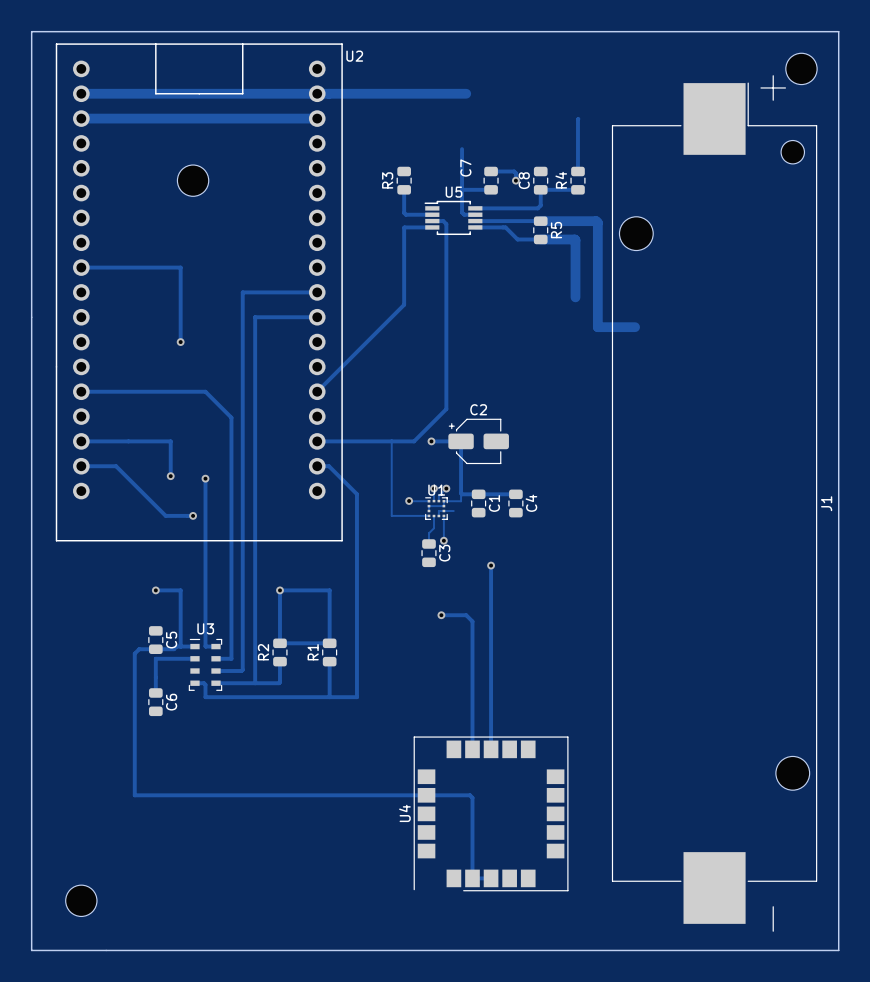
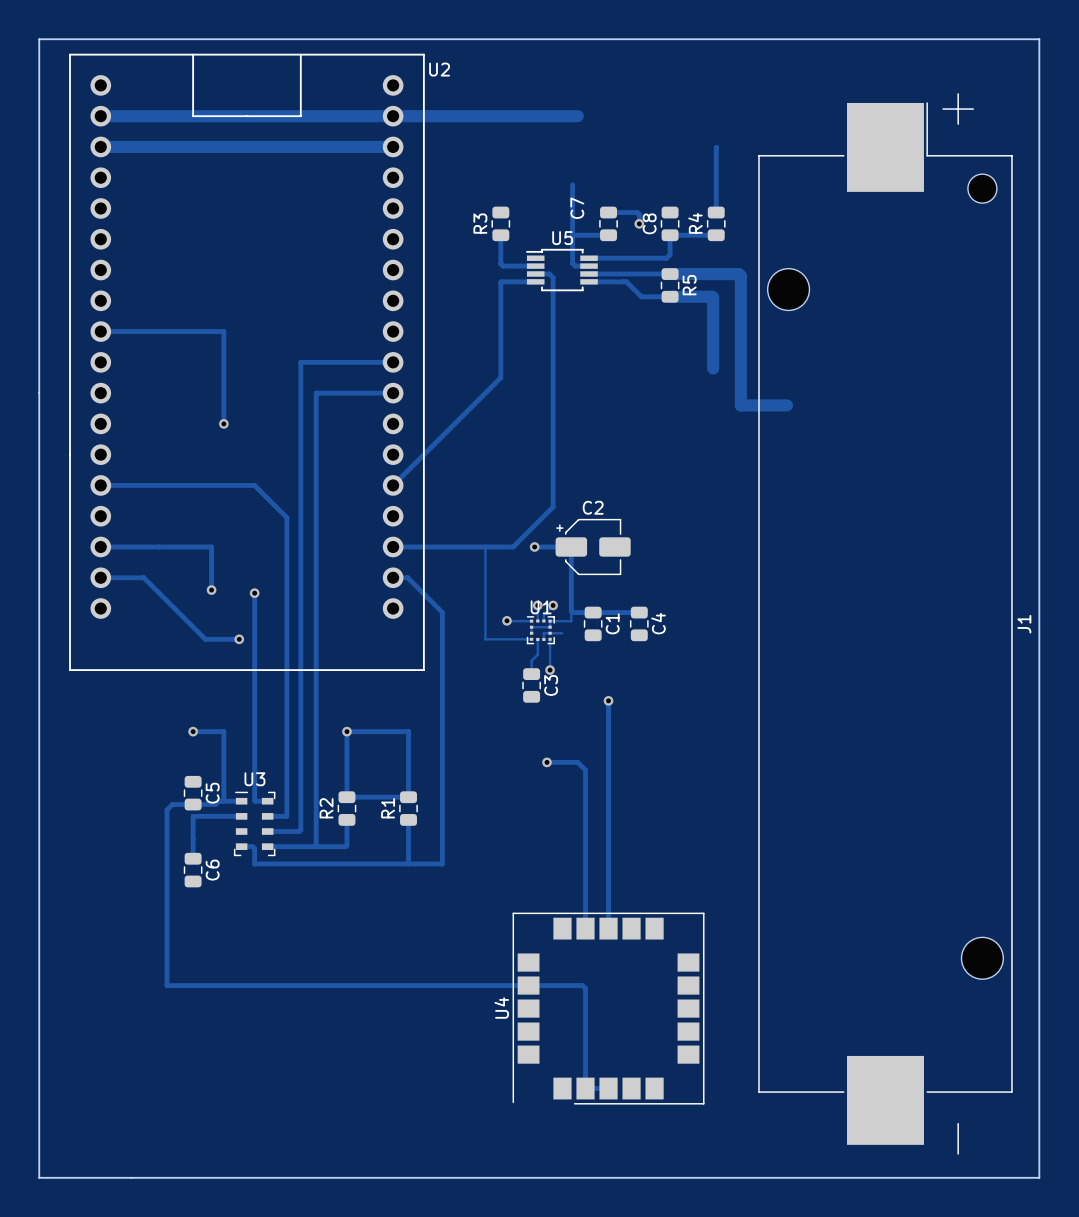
part: (801, 68) -> none
part: (193, 180) -> none
part: (81, 900) -> none

